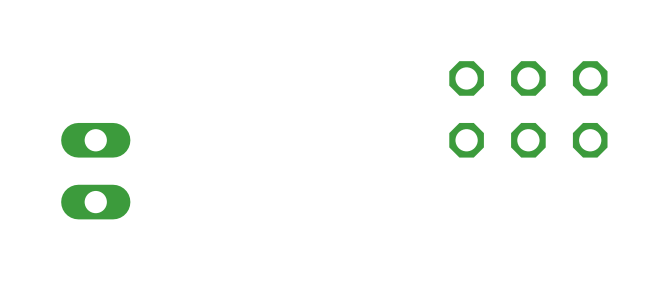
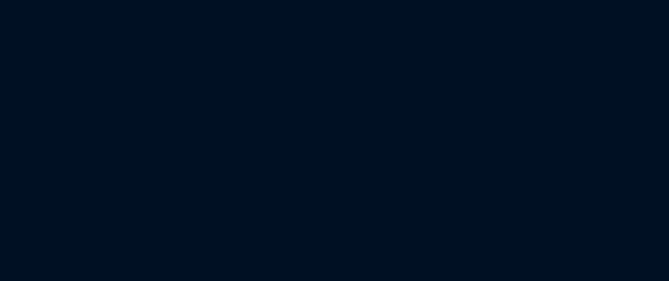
part: (528, 109) -> none
part: (95, 171) -> none

